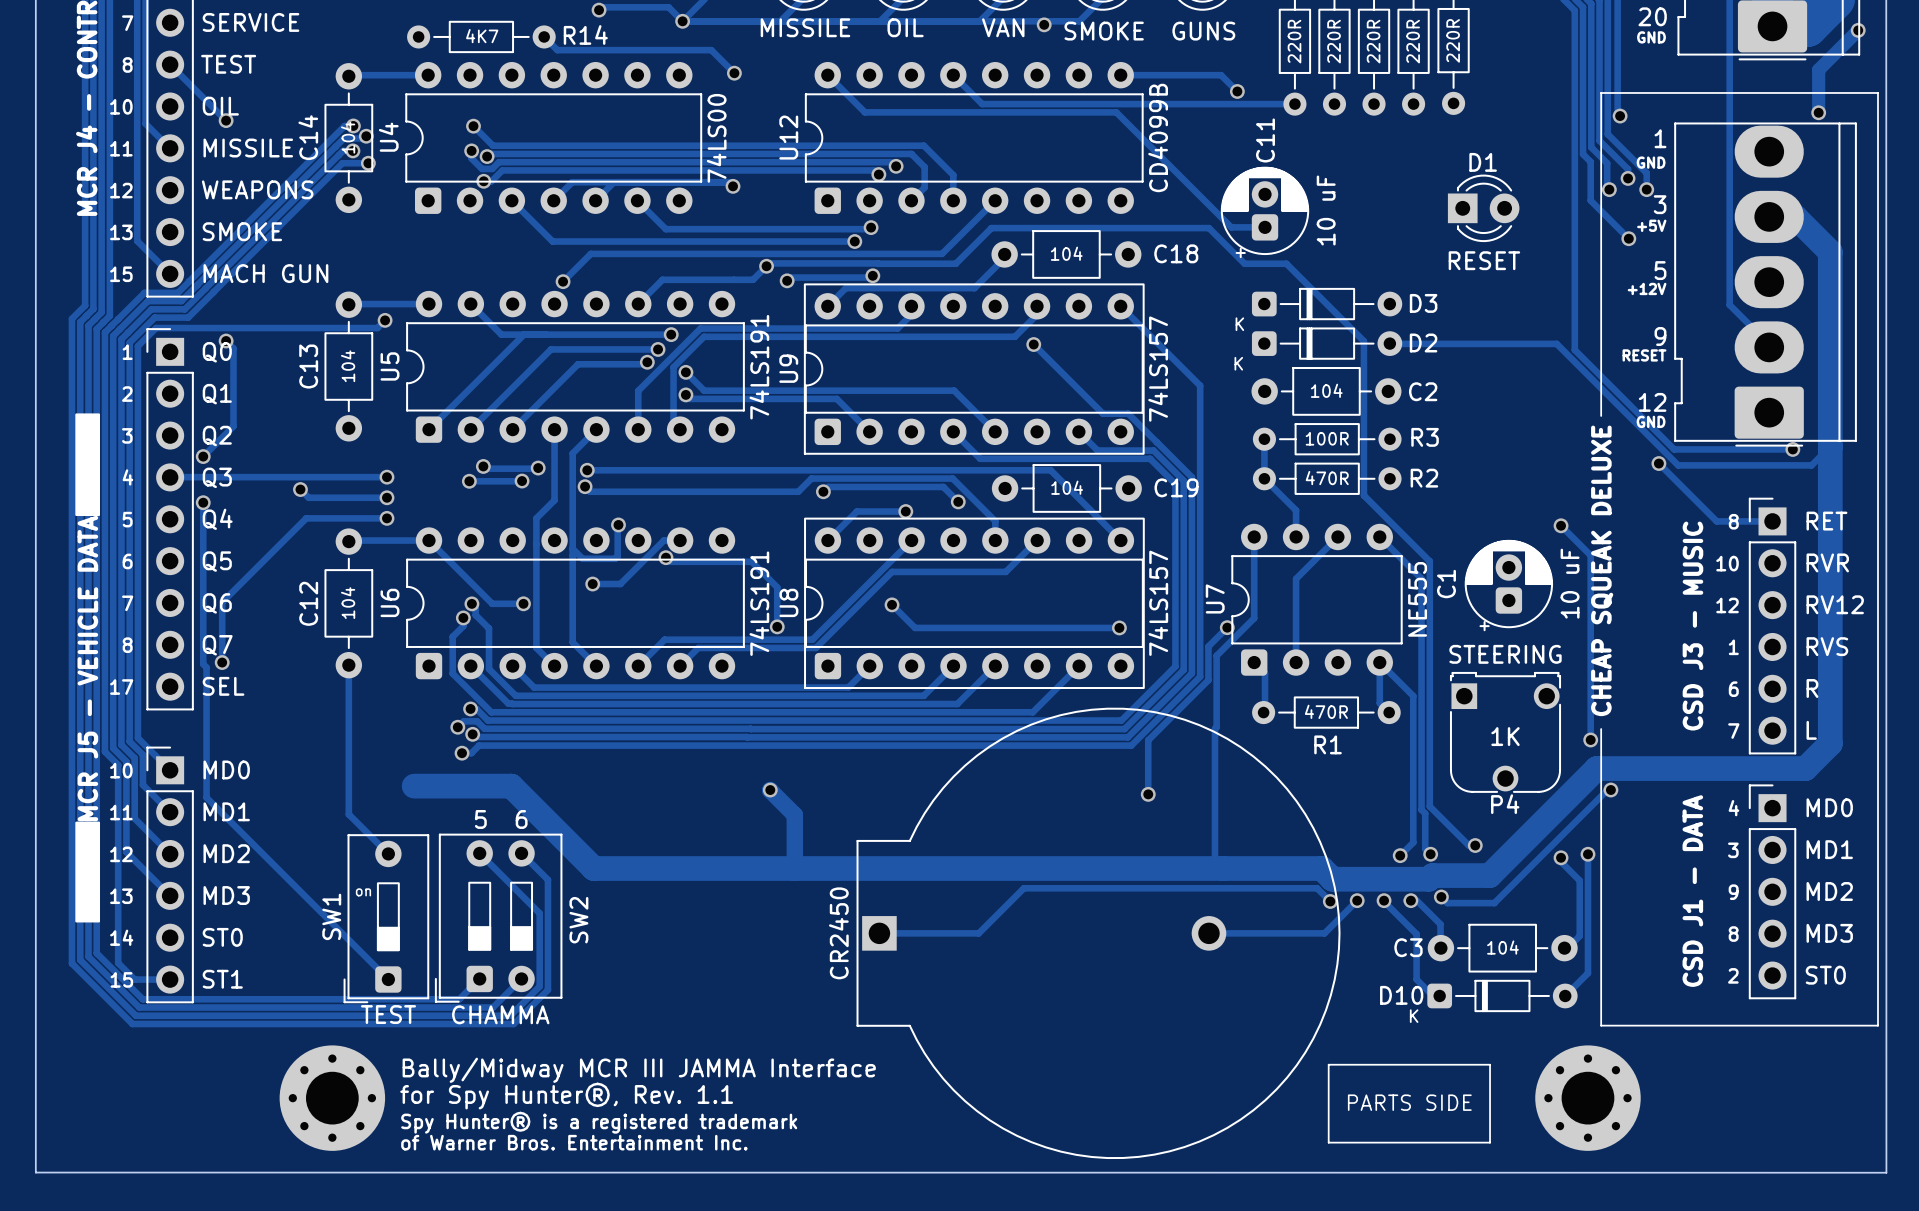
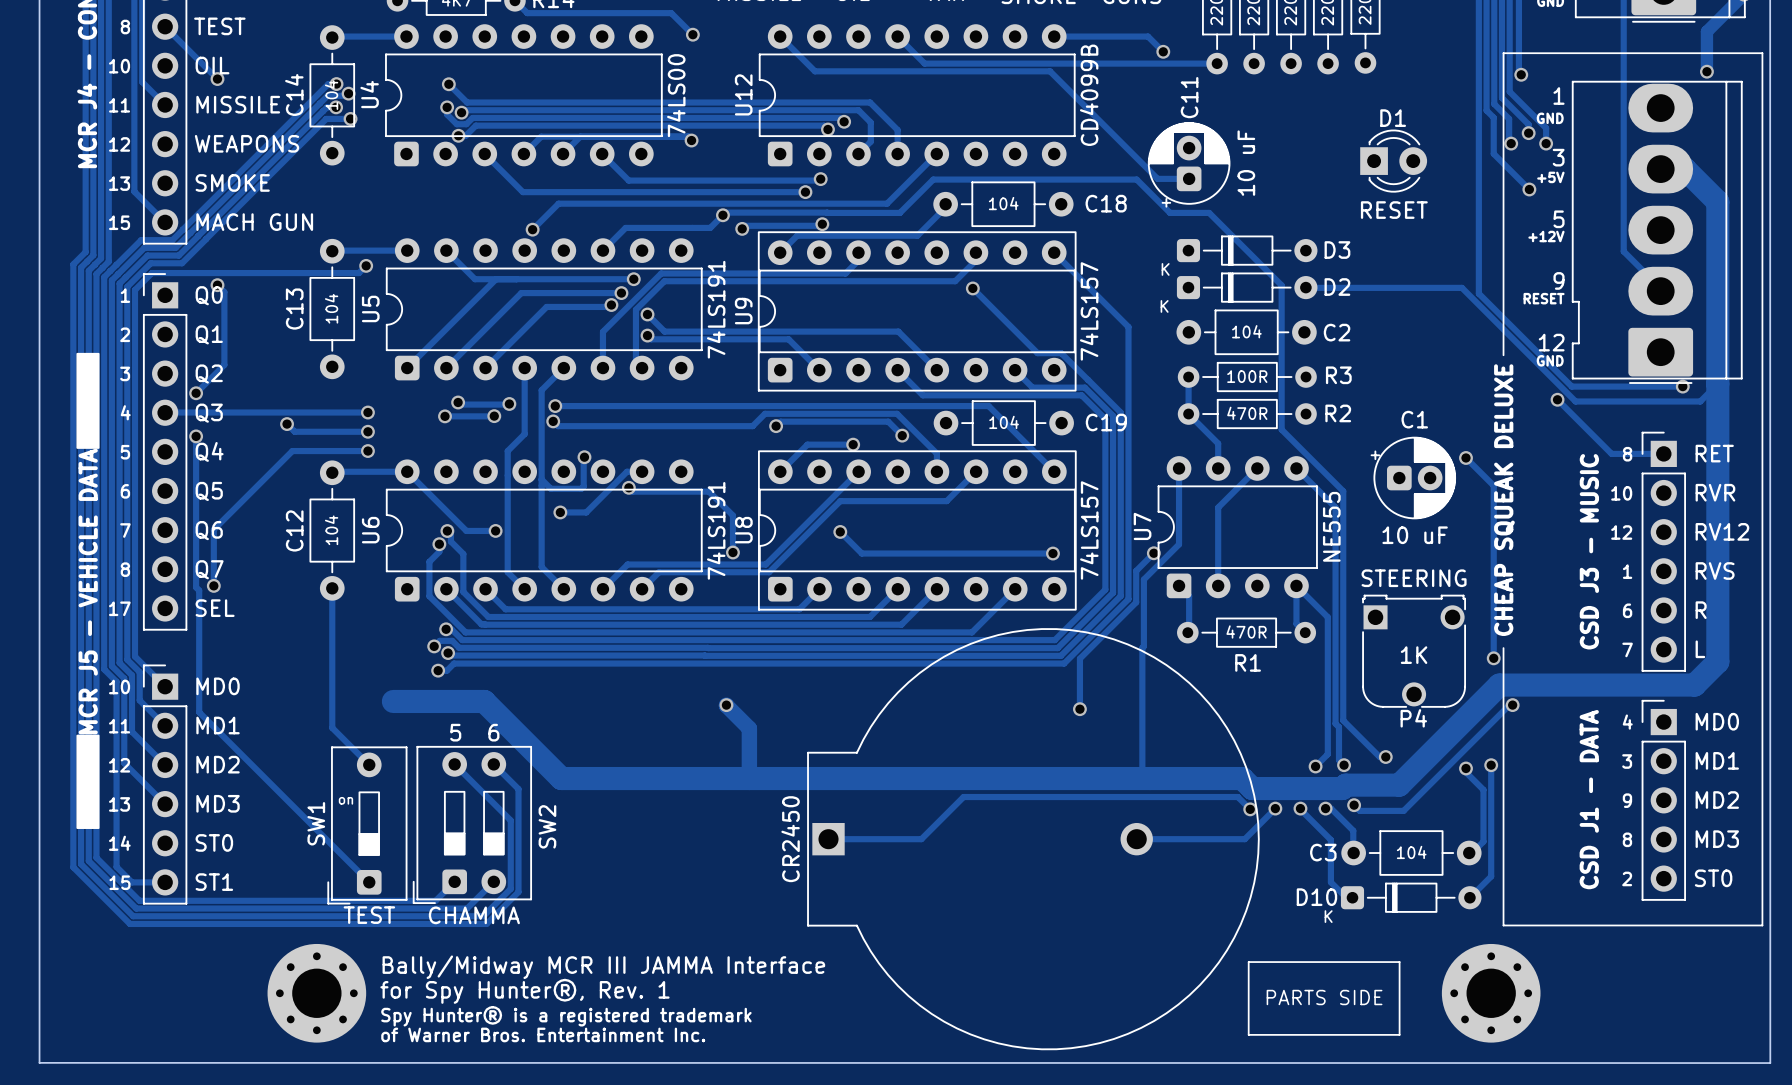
C1 rotation: 0° (1508, 585) -> 90° clockwise (1413, 478)
text: for Spy Hunter®, Rev. 1.1 (566, 1096) -> for Spy Hunter®, Rev. 1 (524, 991)

